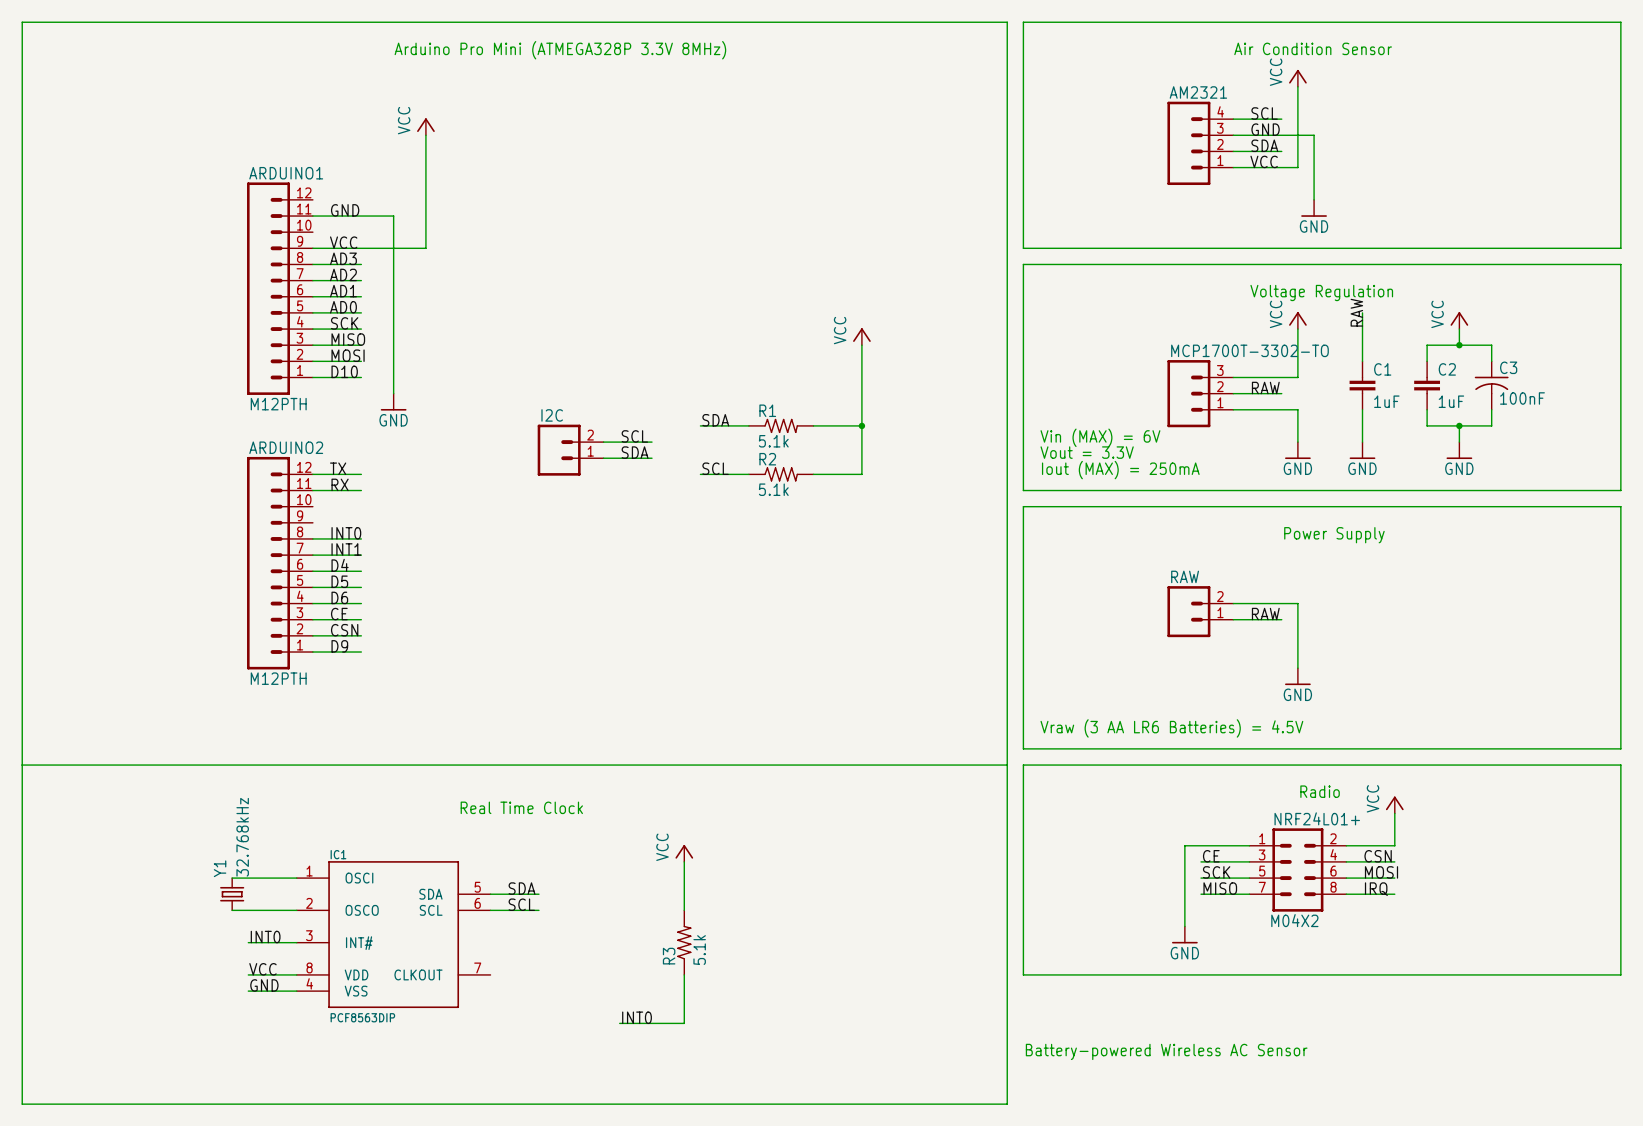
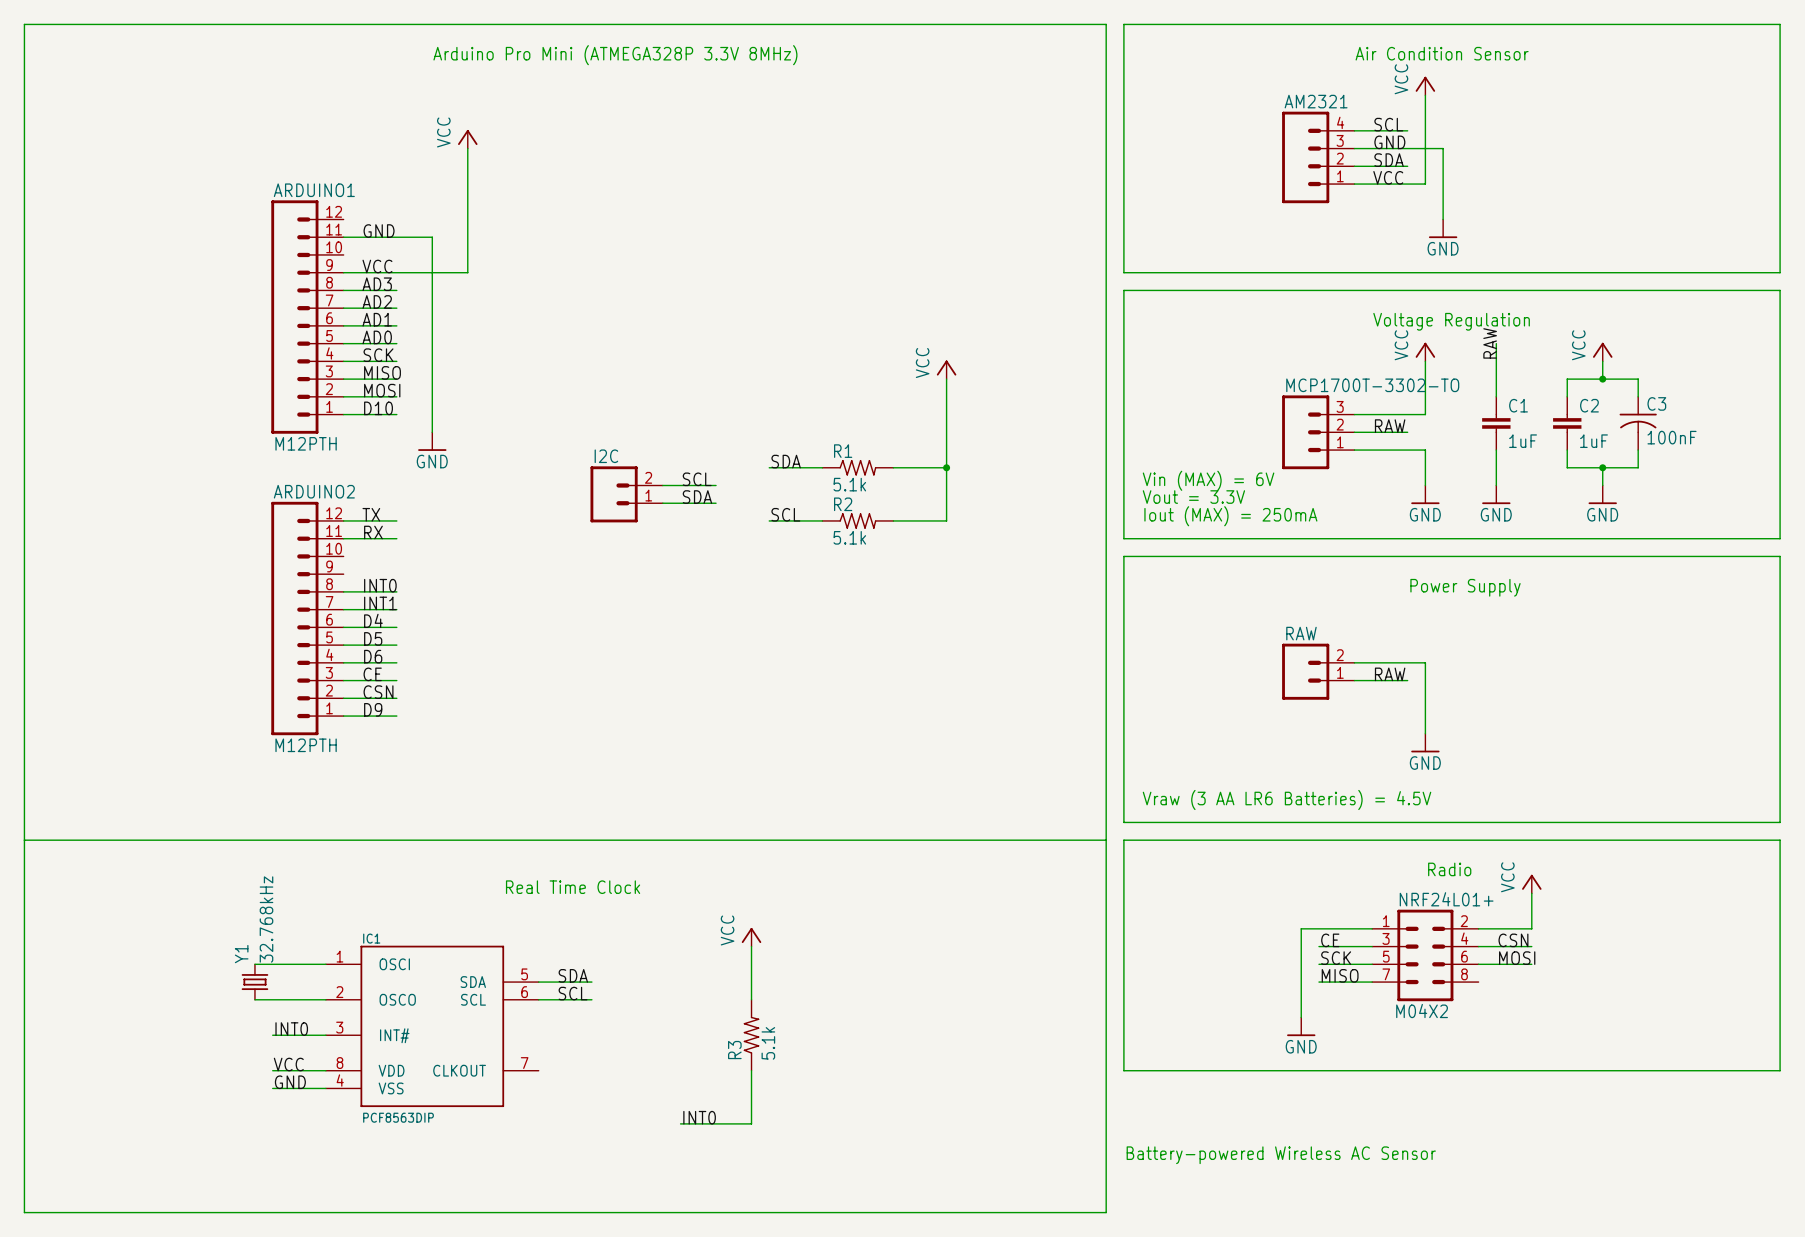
label: IRQ (1376, 889) -> none
wire: (1346, 894) (1394, 894) -> none

